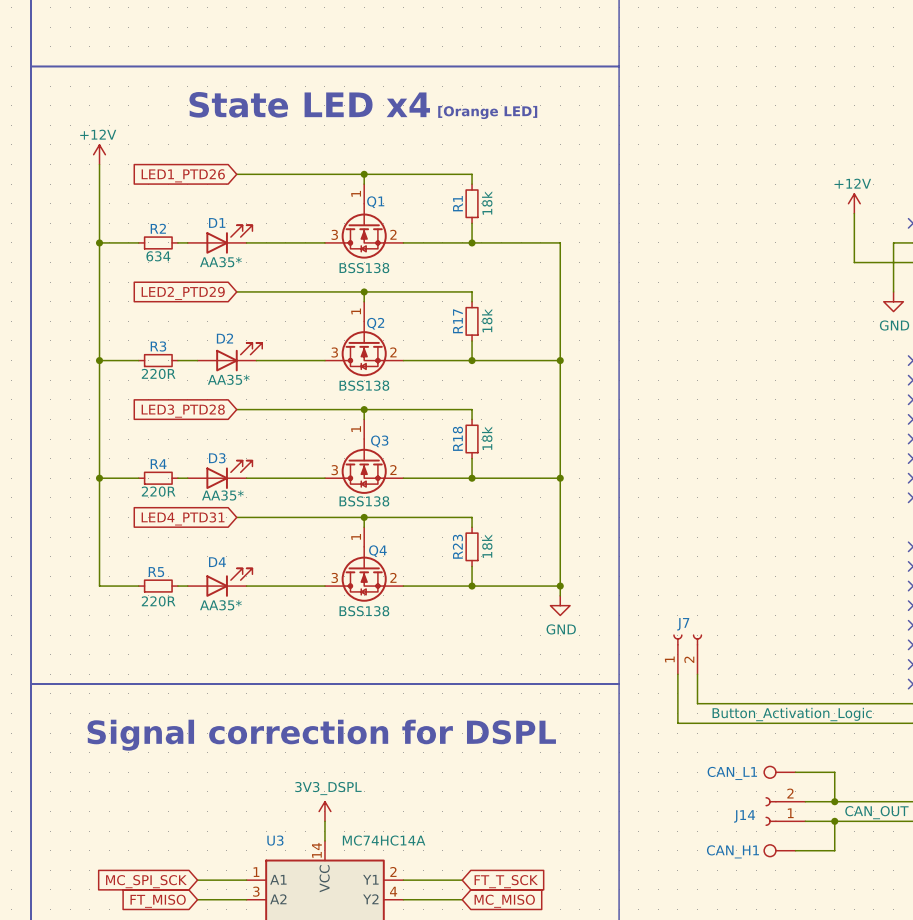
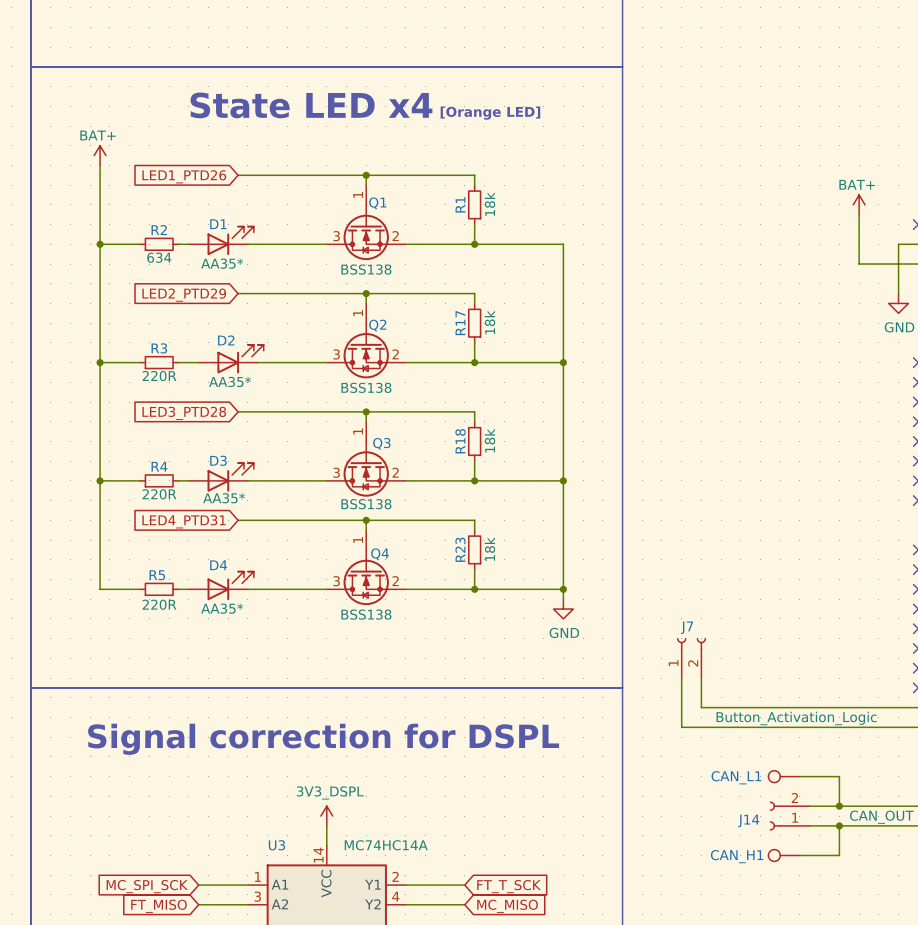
power symbol: +12V (99, 154) -> BAT+ (100, 155)
power symbol: +12V (854, 203) -> BAT+ (859, 204)

